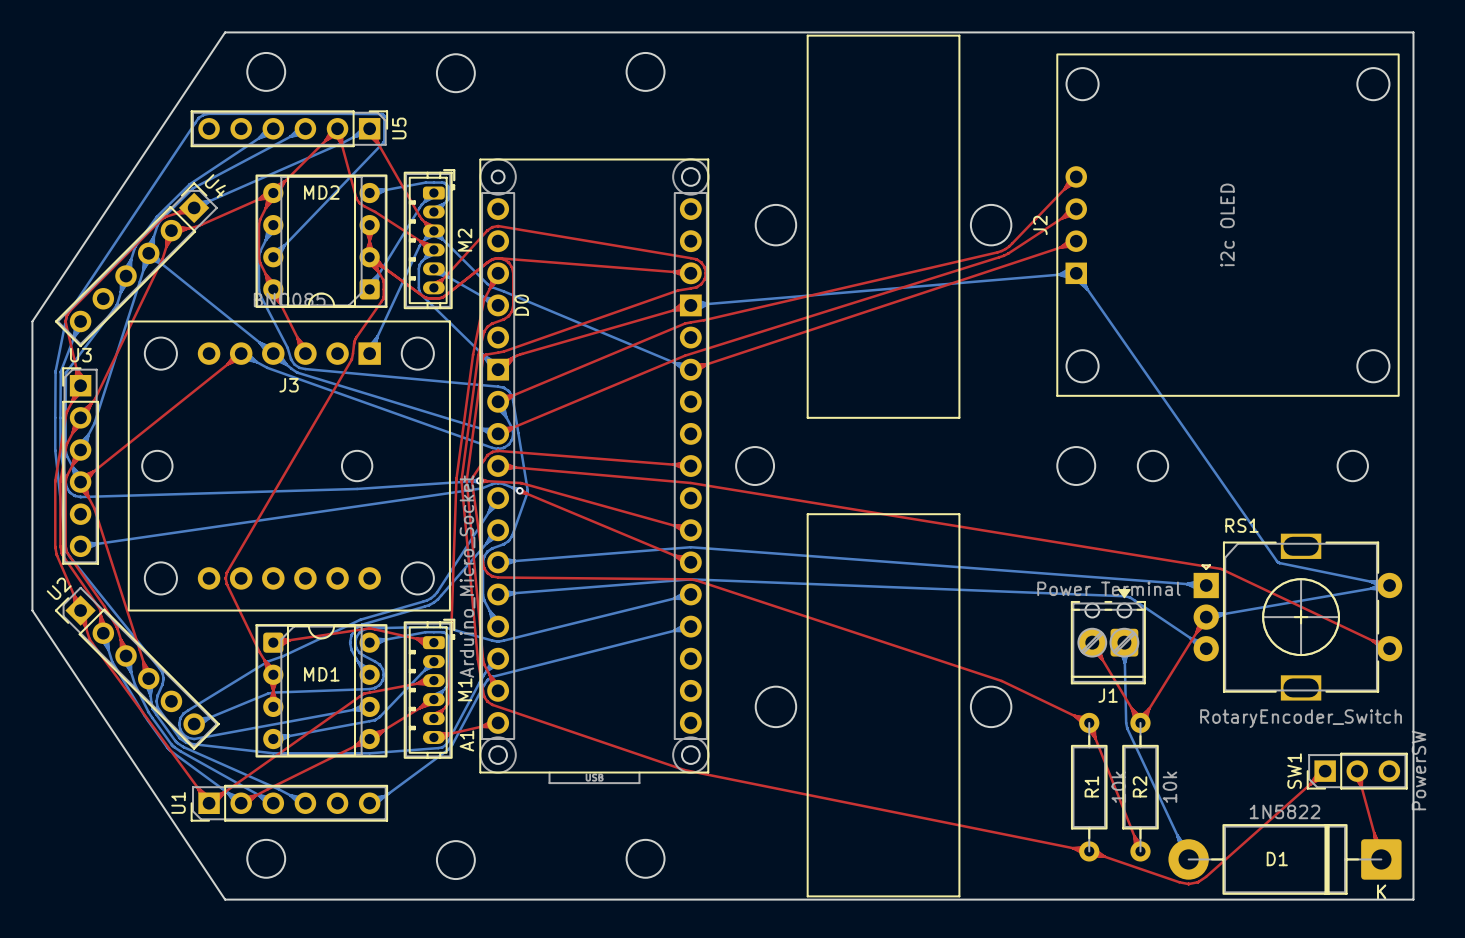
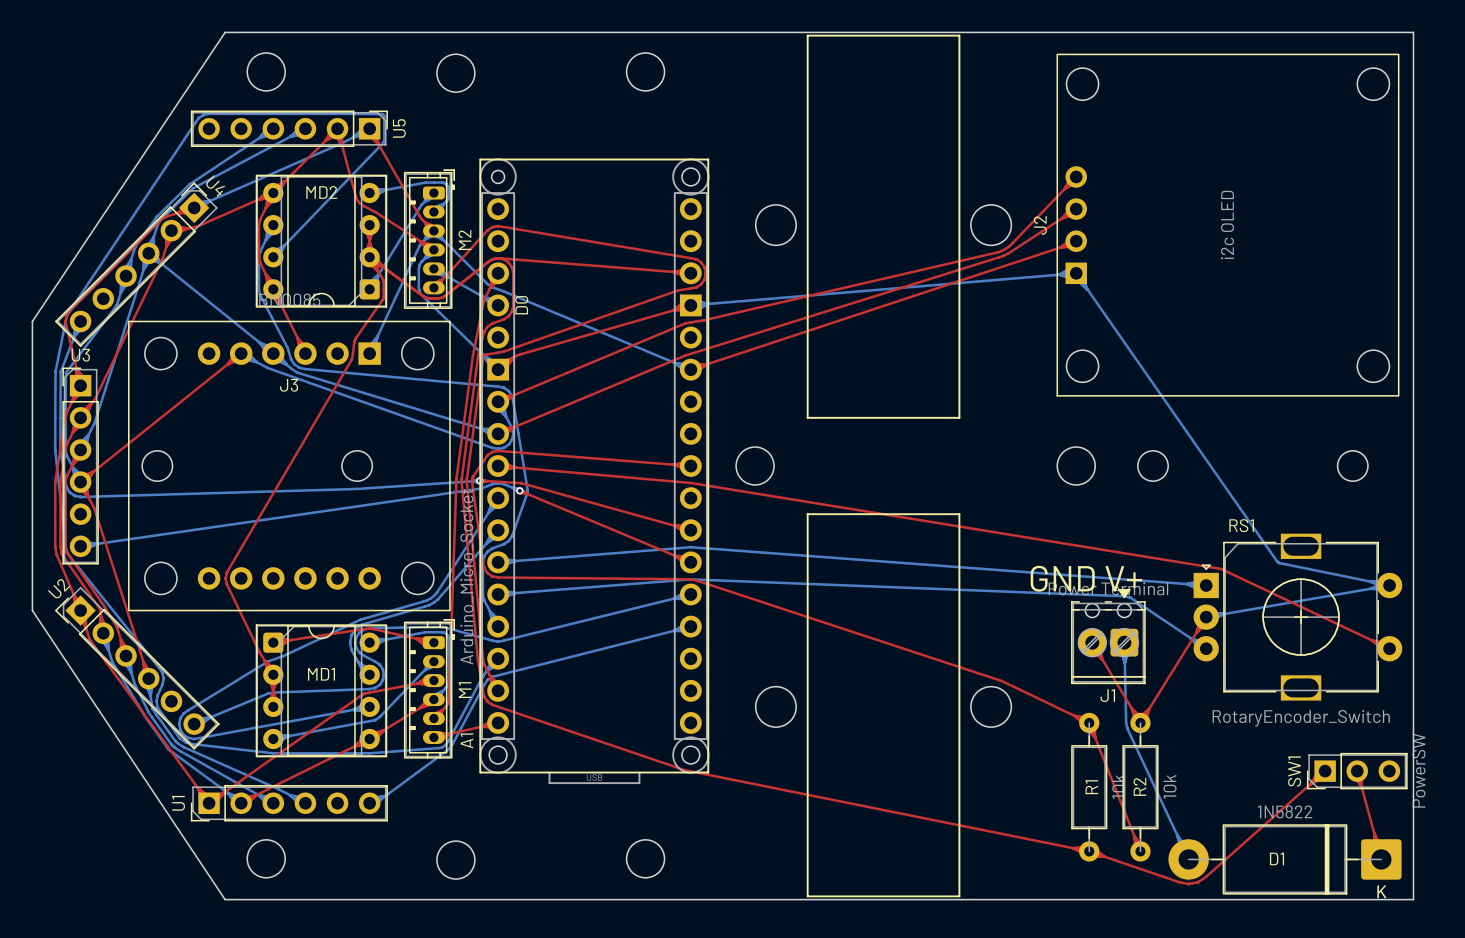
text: none -> GND V+ (1086, 578)

